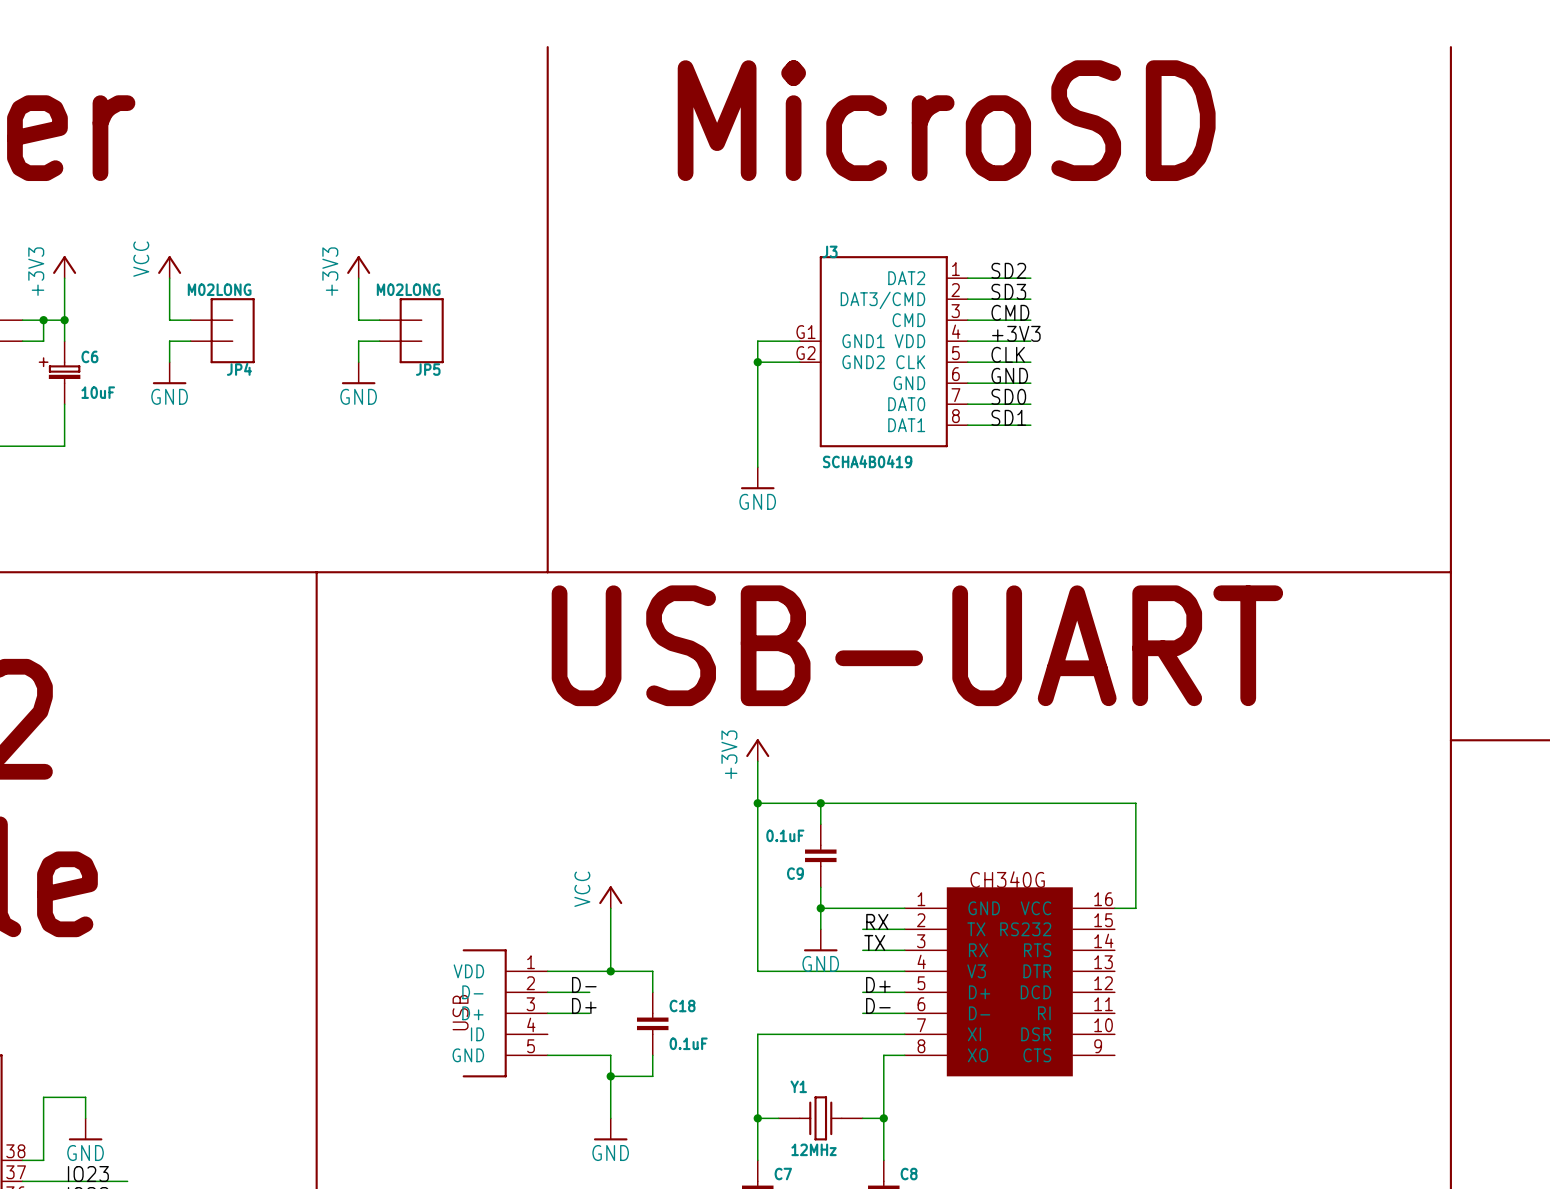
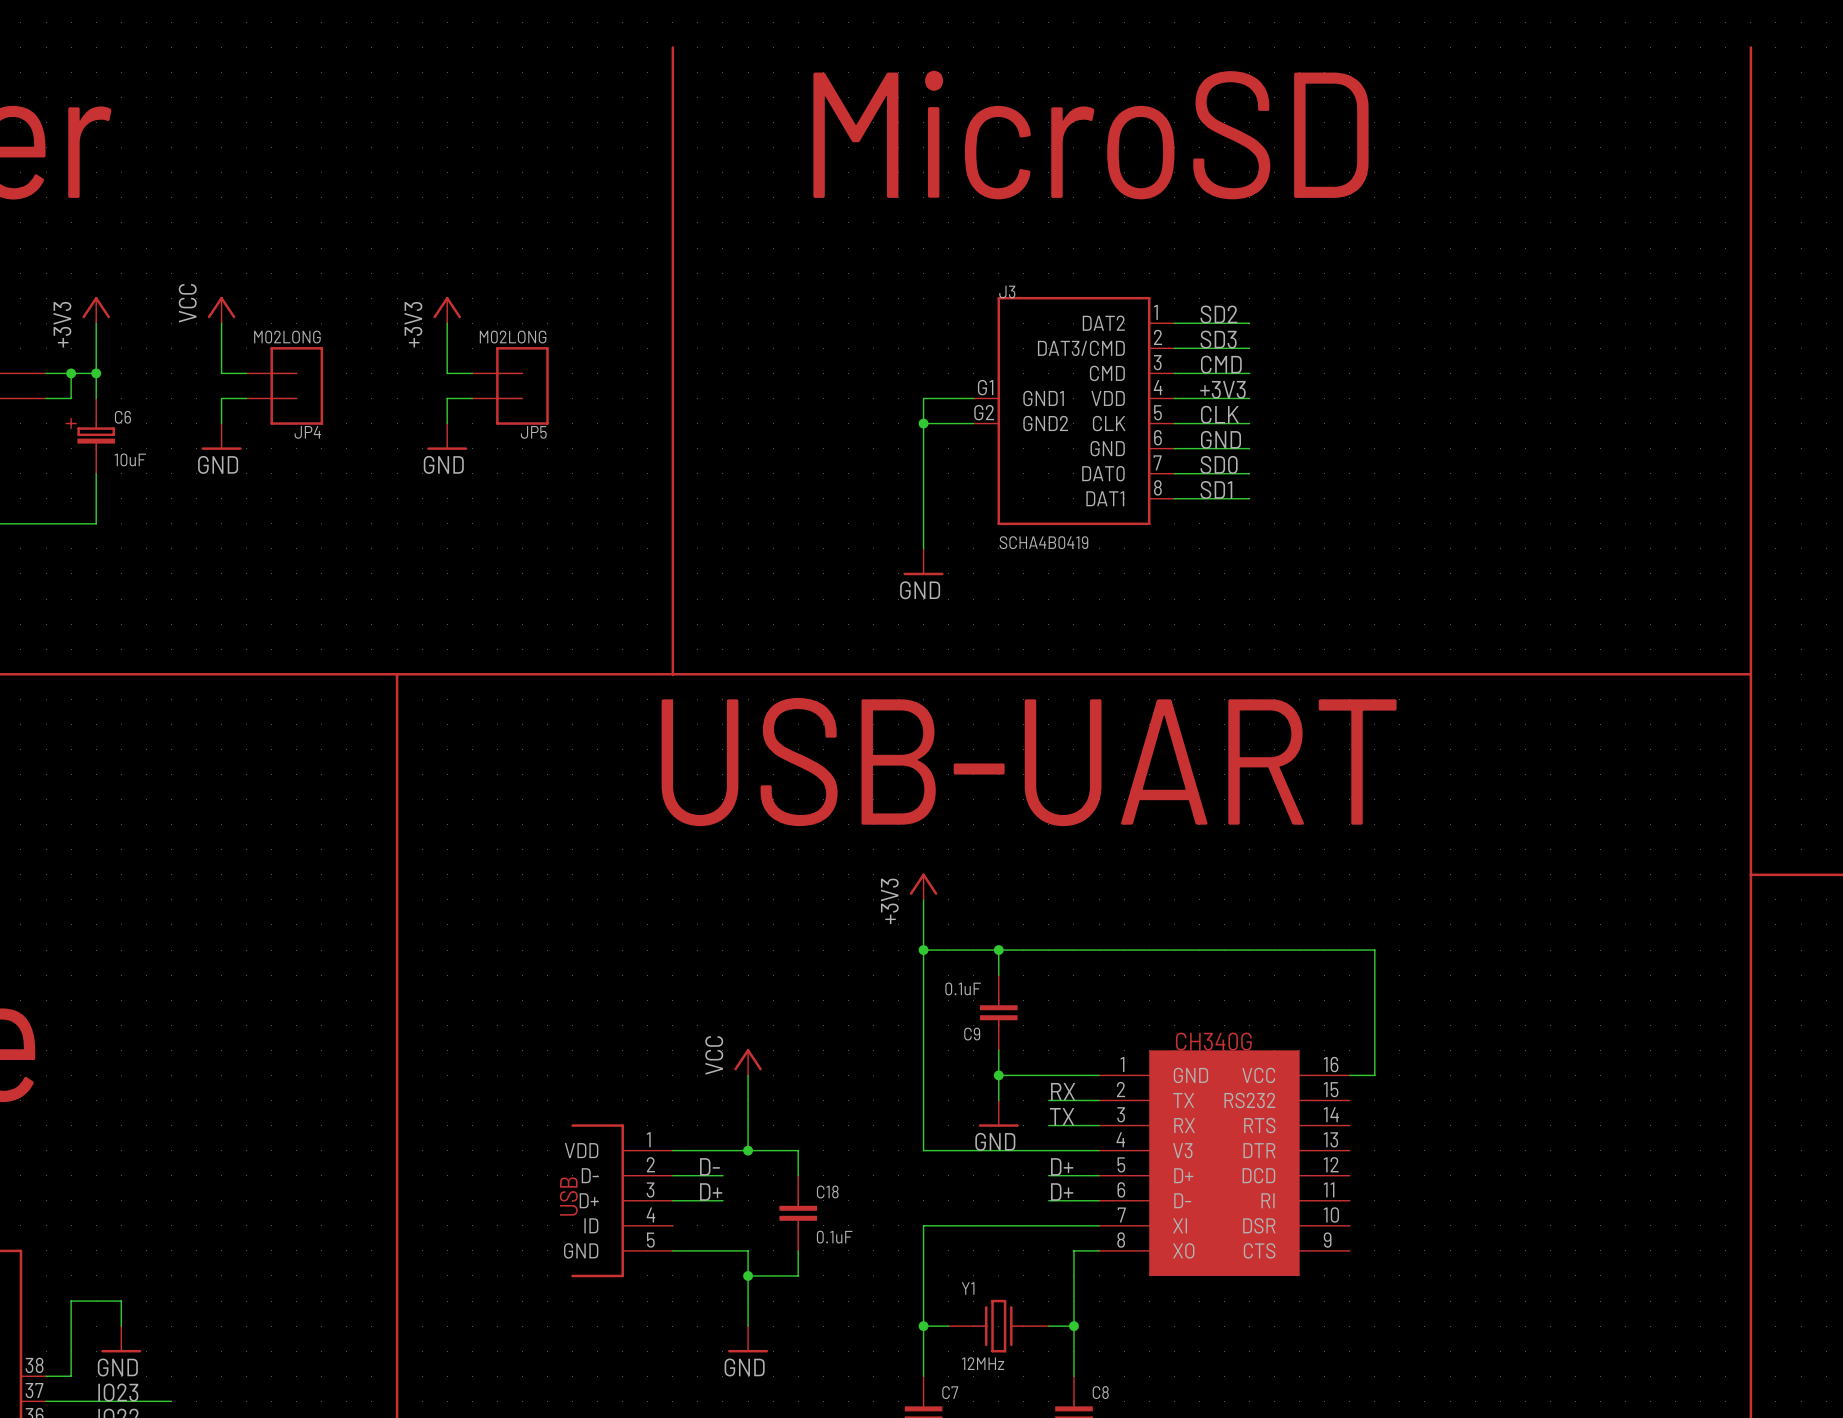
label: D- (878, 1005) -> D+ (1062, 1191)

